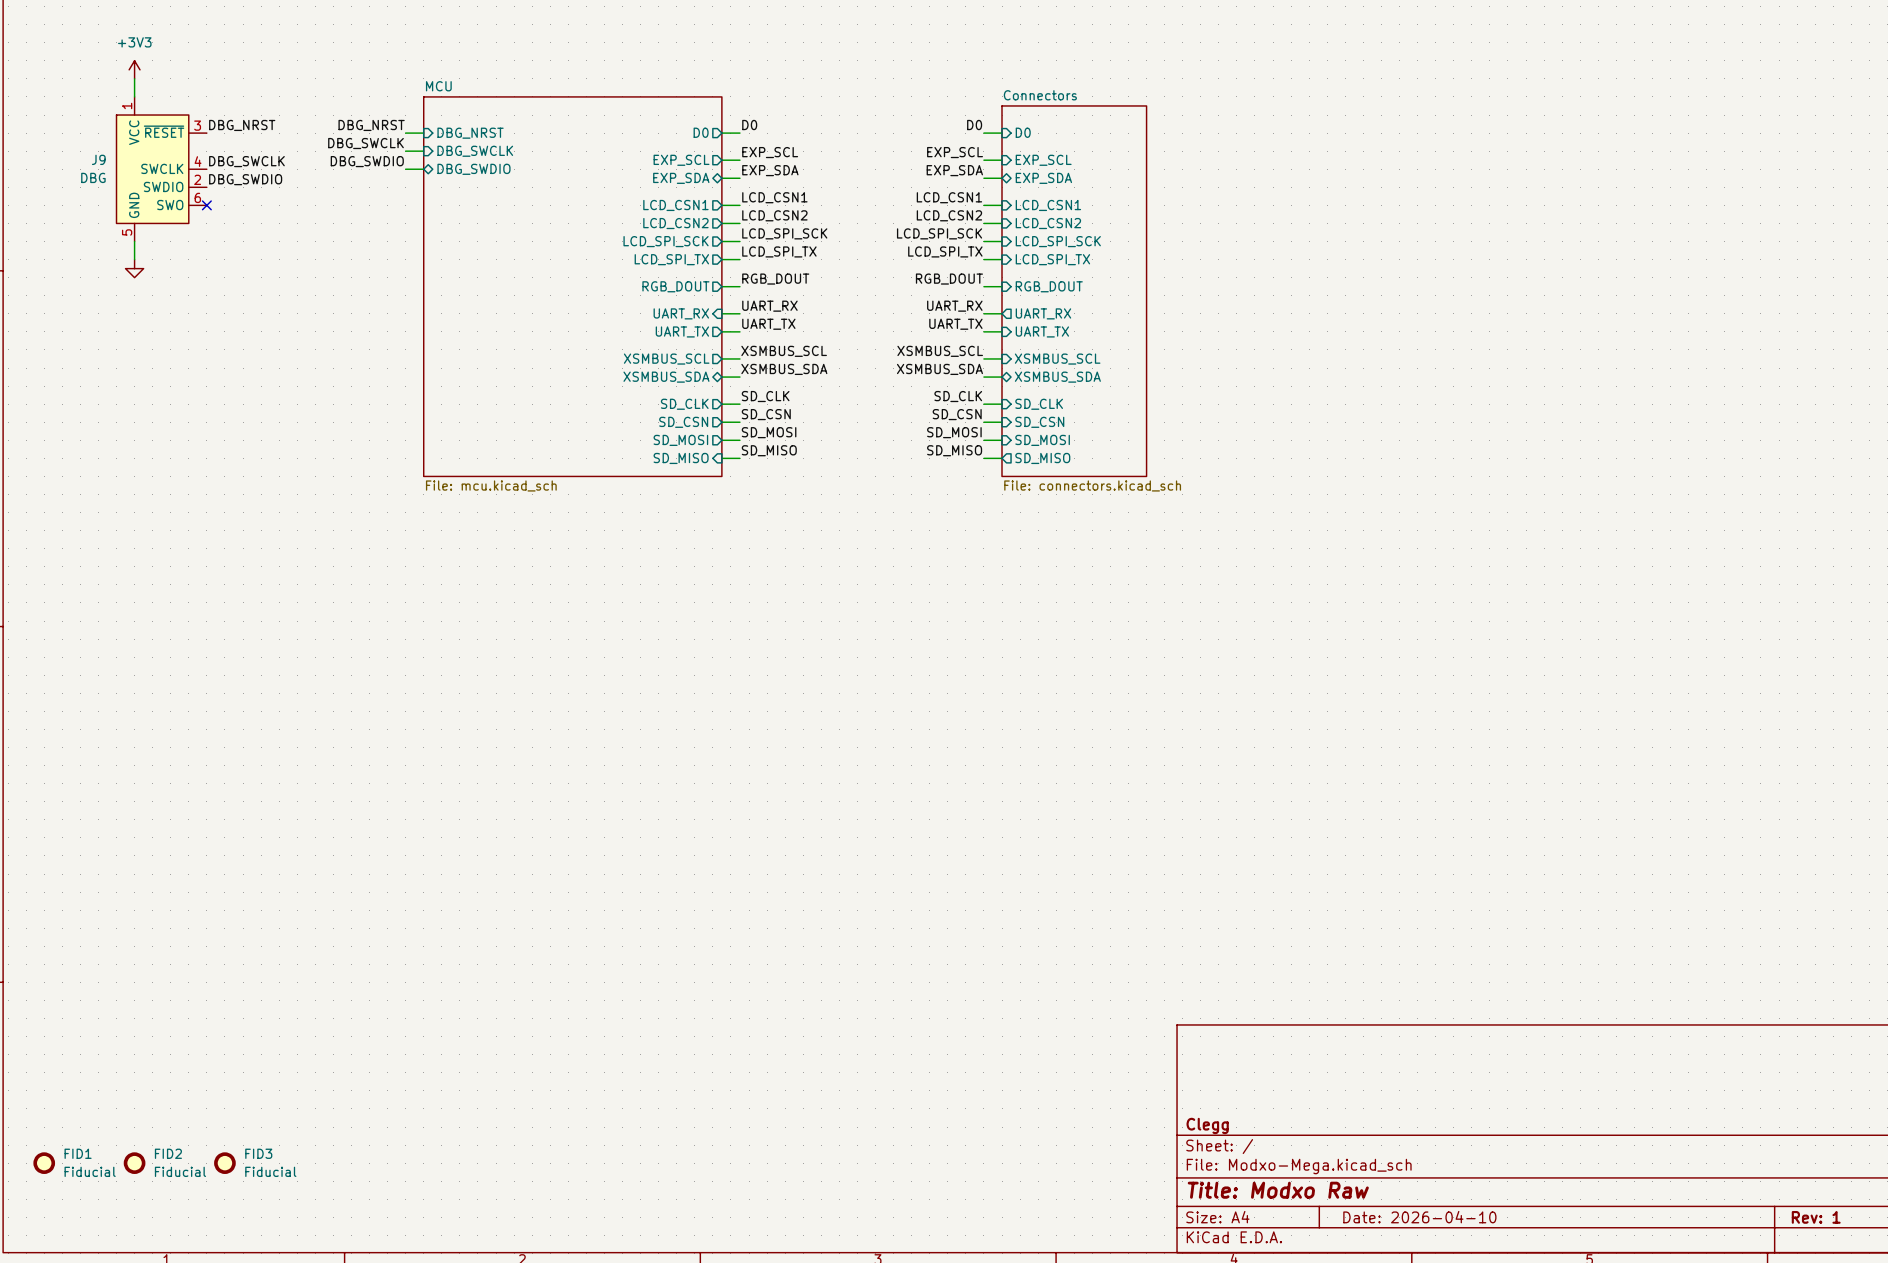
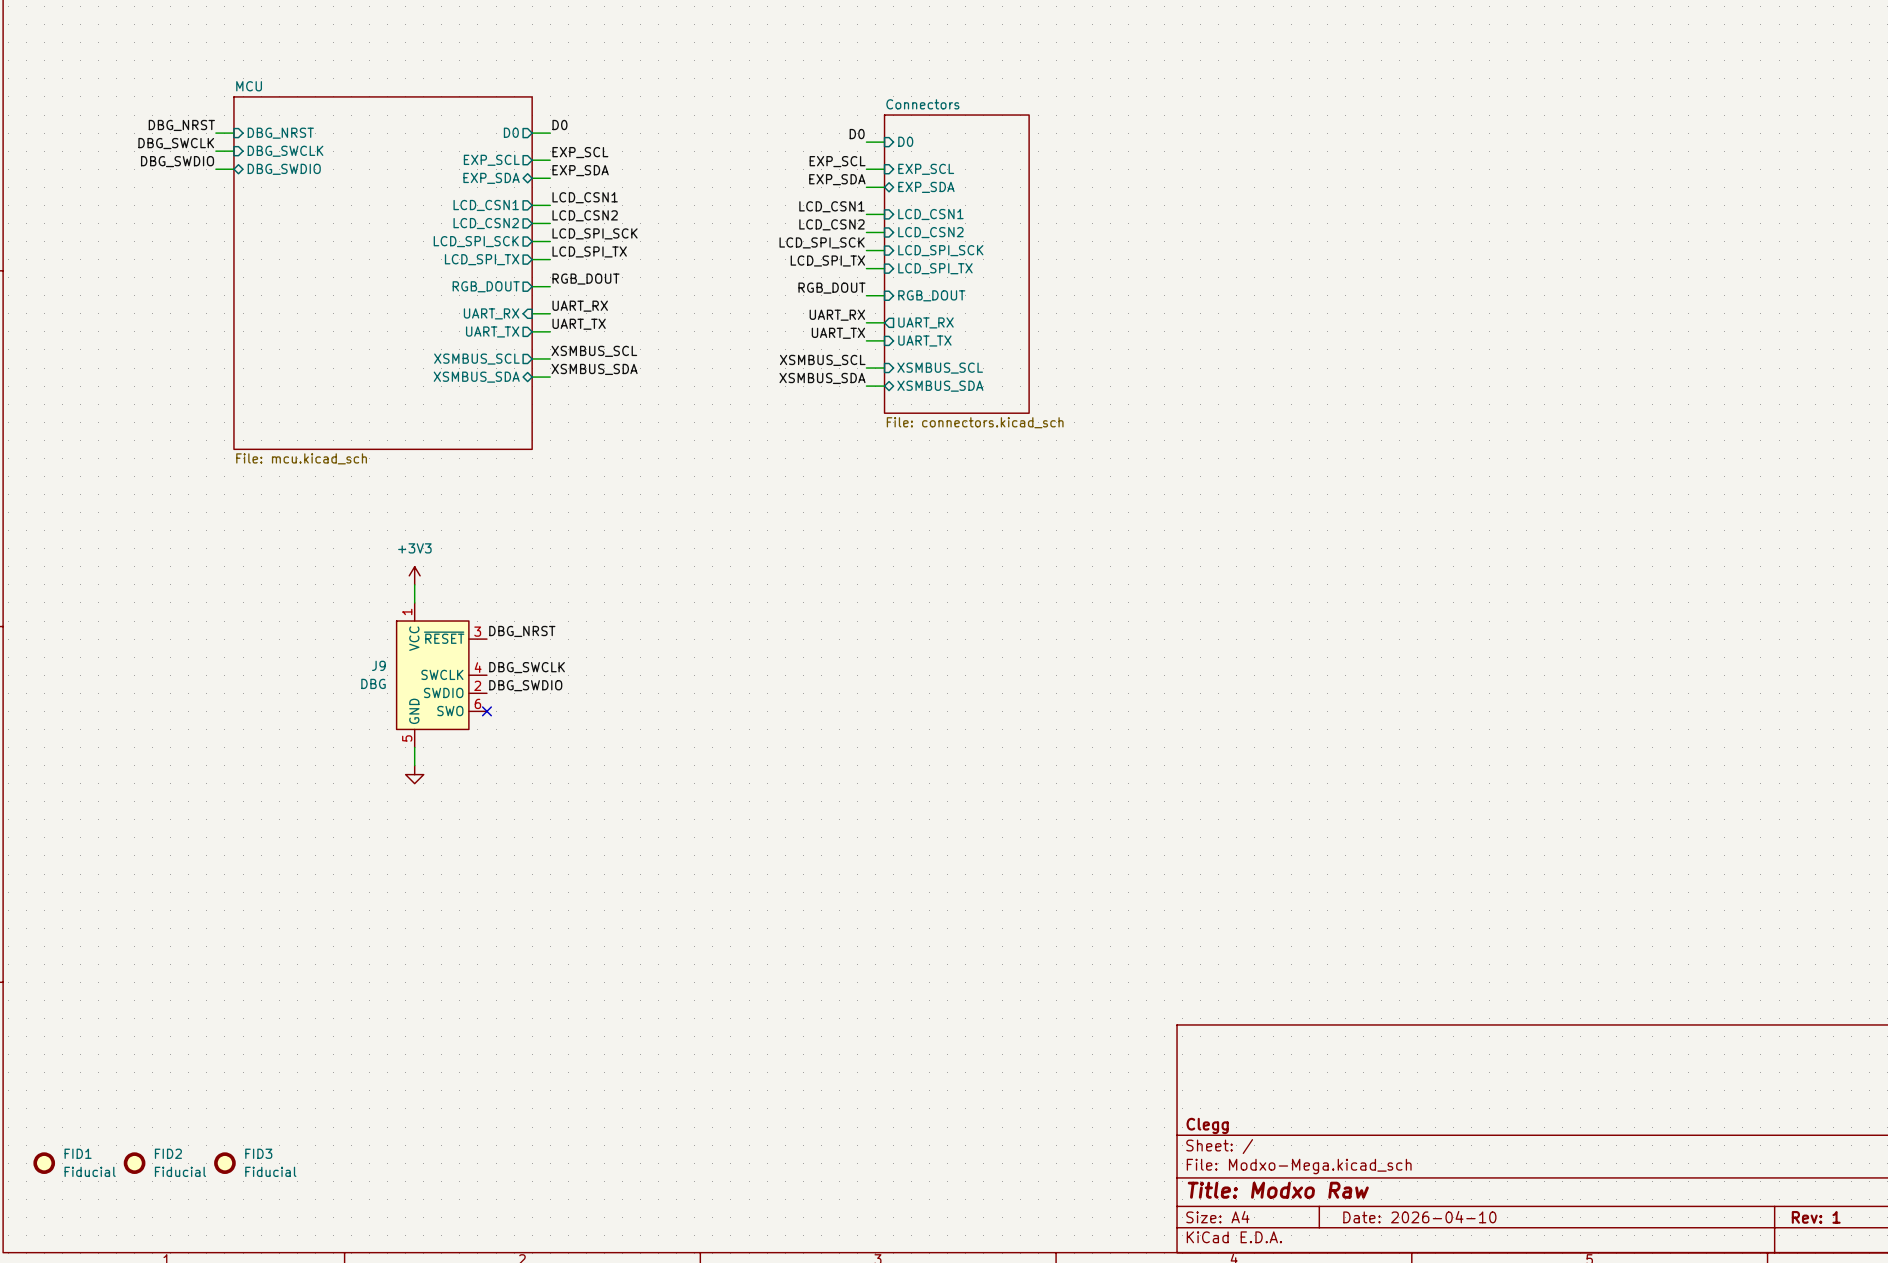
power symbol: +3V3 (134, 69) -> none
wire: (134, 78) (134, 96) -> none
label position: DBG_NRST (242, 125) -> DBG_NRST (181, 125)
label: DBG_NRST (371, 125) -> none
label: none -> D0 (559, 125)
label: D0 (749, 125) -> none
label: D0 (974, 125) -> none
sheet pin: none -> D0 (511, 132)
sheet pin: D0 (701, 132) -> none
sheet pin: D0 (1023, 132) -> none
wire: none -> (215, 133) (233, 133)
sheet pin: none -> DBG_NRST (280, 133)
wire: (405, 133) (423, 133) -> (532, 205) (550, 205)
sheet pin: DBG_NRST (470, 133) -> none
wire: none -> (532, 133) (550, 133)
wire: (721, 133) (739, 133) -> none
wire: (983, 133) (1002, 133) -> (866, 142) (884, 142)
label: none -> D0 (857, 134)
sheet pin: none -> D0 (905, 141)
label: DBG_SWCLK (365, 143) -> none
wire: none -> (215, 151) (233, 151)
sheet pin: none -> DBG_SWCLK (285, 151)
wire: (405, 151) (423, 151) -> (532, 223) (550, 223)
sheet pin: DBG_SWCLK (475, 151) -> none
label: none -> EXP_SCL (580, 152)
label: EXP_SCL (770, 152) -> none
label: EXP_SCL (955, 152) -> none
sheet pin: none -> EXP_SCL (491, 160)
wire: none -> (532, 160) (550, 160)
sheet pin: EXP_SCL (681, 160) -> none
wire: (721, 160) (739, 160) -> none
wire: (983, 160) (1002, 160) -> (866, 169) (884, 169)
sheet pin: EXP_SCL (1043, 160) -> none
label position: DBG_SWCLK (246, 161) -> DBG_SWCLK (176, 143)
label: DBG_SWDIO (367, 161) -> none
label: none -> EXP_SCL (837, 161)
J9 position: (161, 169) -> (441, 675)
wire: none -> (215, 169) (233, 169)
sheet pin: none -> DBG_SWDIO (284, 169)
wire: (405, 169) (423, 169) -> (532, 241) (550, 241)
sheet pin: DBG_SWDIO (473, 169) -> none
sheet pin: none -> EXP_SCL (926, 169)
label: none -> EXP_SDA (580, 170)
label: EXP_SDA (770, 170) -> none
label: EXP_SDA (954, 170) -> none
sheet pin: none -> EXP_SDA (491, 178)
wire: none -> (532, 178) (550, 178)
sheet pin: EXP_SDA (681, 178) -> none
wire: (721, 178) (739, 178) -> none
wire: (983, 178) (1002, 178) -> (866, 187) (884, 187)
sheet pin: EXP_SDA (1043, 178) -> none
label position: DBG_SWDIO (245, 179) -> DBG_SWDIO (177, 161)
label: none -> EXP_SDA (837, 179)
sheet pin: none -> EXP_SDA (926, 187)
label: none -> LCD_CSN1 (585, 197)
label: LCD_CSN1 (774, 197) -> none
label: LCD_CSN1 (949, 197) -> none
no-connect mark: (206, 205) -> none
sheet pin: none -> LCD_CSN1 (486, 205)
sheet pin: LCD_CSN1 (675, 205) -> none
wire: (721, 205) (739, 205) -> none
wire: (983, 205) (1002, 205) -> (866, 214) (884, 214)
sheet pin: LCD_CSN1 (1048, 205) -> none
label: none -> LCD_CSN1 (831, 206)
sheet pin: none -> LCD_CSN1 (930, 214)
label: none -> LCD_CSN2 (585, 215)
label: LCD_CSN2 (774, 215) -> none
label: LCD_CSN2 (949, 215) -> none
sheet pin: none -> LCD_CSN2 (486, 223)
sheet pin: LCD_CSN2 (675, 223) -> none
wire: (721, 223) (739, 223) -> none
wire: (983, 223) (1002, 223) -> (866, 232) (884, 232)
sheet pin: LCD_CSN2 (1048, 223) -> none
label: none -> LCD_CSN2 (831, 224)
sheet pin: none -> LCD_CSN2 (930, 232)
label: none -> LCD_SPI_SCK (595, 233)
label: LCD_SPI_SCK (784, 233) -> none
label: LCD_SPI_SCK (939, 233) -> none
wire: (134, 241) (134, 259) -> none
sheet pin: none -> LCD_SPI_SCK (476, 241)
sheet pin: LCD_SPI_SCK (666, 241) -> none
wire: (721, 241) (739, 241) -> none
wire: (983, 241) (1002, 241) -> (866, 250) (884, 250)
sheet pin: LCD_SPI_SCK (1058, 241) -> none
label: none -> LCD_SPI_SCK (822, 242)
sheet pin: none -> LCD_SPI_SCK (940, 250)
label: none -> LCD_SPI_TX (589, 251)
label: LCD_SPI_TX (779, 251) -> none
label: LCD_SPI_TX (945, 251) -> none
sheet pin: none -> LCD_SPI_TX (482, 259)
wire: none -> (532, 259) (550, 259)
sheet pin: LCD_SPI_TX (671, 259) -> none
wire: (721, 259) (739, 259) -> none
wire: (983, 259) (1002, 259) -> (866, 268) (884, 268)
sheet pin: LCD_SPI_TX (1052, 259) -> none
label: none -> LCD_SPI_TX (827, 260)
sheet Connectors: none -> File: connectors.kicad_sch (956, 264)
power symbol: (134, 268) -> none
sheet pin: none -> LCD_SPI_TX (935, 268)
sheet MCU: none -> File: mcu.kicad_sch (383, 273)
label: none -> RGB_DOUT (585, 279)
label position: RGB_DOUT (775, 279) -> RGB_DOUT (831, 288)
label: RGB_DOUT (949, 279) -> none
sheet pin: none -> RGB_DOUT (486, 286)
wire: none -> (532, 286) (550, 286)
sheet MCU: File: mcu.kicad_sch (572, 286) -> none
sheet pin: RGB_DOUT (675, 286) -> none
wire: (721, 286) (739, 286) -> none
wire: (983, 286) (1002, 286) -> (866, 295) (884, 295)
sheet pin: RGB_DOUT (1049, 286) -> none
sheet Connectors: File: connectors.kicad_sch (1074, 291) -> none
sheet pin: none -> RGB_DOUT (931, 295)
label: none -> UART_RX (580, 306)
label: UART_RX (769, 306) -> none
label: UART_RX (954, 306) -> none
sheet pin: none -> UART_RX (491, 313)
wire: none -> (532, 313) (550, 313)
sheet pin: UART_RX (681, 313) -> none
wire: (721, 313) (739, 313) -> none
wire: (983, 313) (1002, 313) -> (866, 322) (884, 322)
sheet pin: UART_RX (1043, 313) -> none
label: none -> UART_RX (837, 315)
sheet pin: none -> UART_RX (925, 322)
label: none -> UART_TX (579, 324)
label: UART_TX (768, 324) -> none
label: UART_TX (955, 324) -> none
sheet pin: none -> UART_TX (492, 331)
wire: none -> (532, 331) (550, 331)
sheet pin: UART_TX (682, 331) -> none
wire: (721, 331) (739, 331) -> none
wire: (983, 331) (1002, 331) -> (866, 340) (884, 340)
sheet pin: UART_TX (1042, 331) -> none
label: none -> UART_TX (838, 333)
sheet pin: none -> UART_TX (924, 341)
label: none -> XSMBUS_SCL (594, 351)
label: XSMBUS_SCL (784, 351) -> none
label: XSMBUS_SCL (940, 351) -> none
wire: none -> (532, 358) (550, 358)
wire: (721, 358) (739, 358) -> none
wire: (983, 358) (1002, 358) -> (866, 368) (884, 368)
sheet pin: none -> XSMBUS_SCL (476, 359)
sheet pin: XSMBUS_SCL (666, 359) -> none
sheet pin: XSMBUS_SCL (1057, 359) -> none
label: none -> XSMBUS_SCL (822, 360)
sheet pin: none -> XSMBUS_SCL (940, 368)
label: none -> XSMBUS_SDA (594, 369)
label: XSMBUS_SDA (784, 369) -> none
label: XSMBUS_SDA (939, 369) -> none
sheet pin: none -> XSMBUS_SDA (476, 377)
wire: none -> (532, 377) (550, 377)
sheet pin: XSMBUS_SDA (666, 377) -> none
wire: (721, 377) (739, 377) -> none
wire: (983, 377) (1002, 377) -> (866, 386) (884, 386)
sheet pin: XSMBUS_SDA (1057, 377) -> none
label: none -> XSMBUS_SDA (822, 378)
sheet pin: none -> XSMBUS_SDA (940, 386)
label: SD_CLK (765, 396) -> none
label: SD_CLK (958, 396) -> none
sheet pin: SD_CLK (684, 404) -> none
wire: (721, 404) (739, 404) -> none
wire: (983, 404) (1002, 404) -> none
sheet pin: SD_CLK (1039, 404) -> none
label: SD_CSN (766, 414) -> none
label: SD_CSN (957, 414) -> none
sheet pin: SD_CSN (683, 422) -> none
wire: (721, 422) (739, 422) -> none
wire: (983, 422) (1002, 422) -> none
sheet pin: SD_CSN (1039, 422) -> none
label: SD_MOSI (769, 432) -> none
label: SD_MOSI (954, 432) -> none
sheet pin: SD_MOSI (680, 440) -> none
wire: (721, 440) (739, 440) -> none
wire: (983, 440) (1002, 440) -> none
sheet pin: SD_MOSI (1042, 440) -> none
label: SD_MISO (769, 450) -> none
label: SD_MISO (954, 450) -> none
sheet pin: SD_MISO (681, 458) -> none
wire: (721, 458) (739, 458) -> none
wire: (983, 458) (1002, 458) -> none
sheet pin: SD_MISO (1042, 458) -> none
power symbol: none -> +3V3 (414, 575)
wire: none -> (414, 584) (414, 602)
label: none -> DBG_NRST (522, 631)
label: none -> DBG_SWCLK (527, 667)
label: none -> DBG_SWDIO (525, 685)
no-connect mark: none -> (486, 711)
wire: none -> (414, 747) (414, 765)
power symbol: none -> (414, 774)

